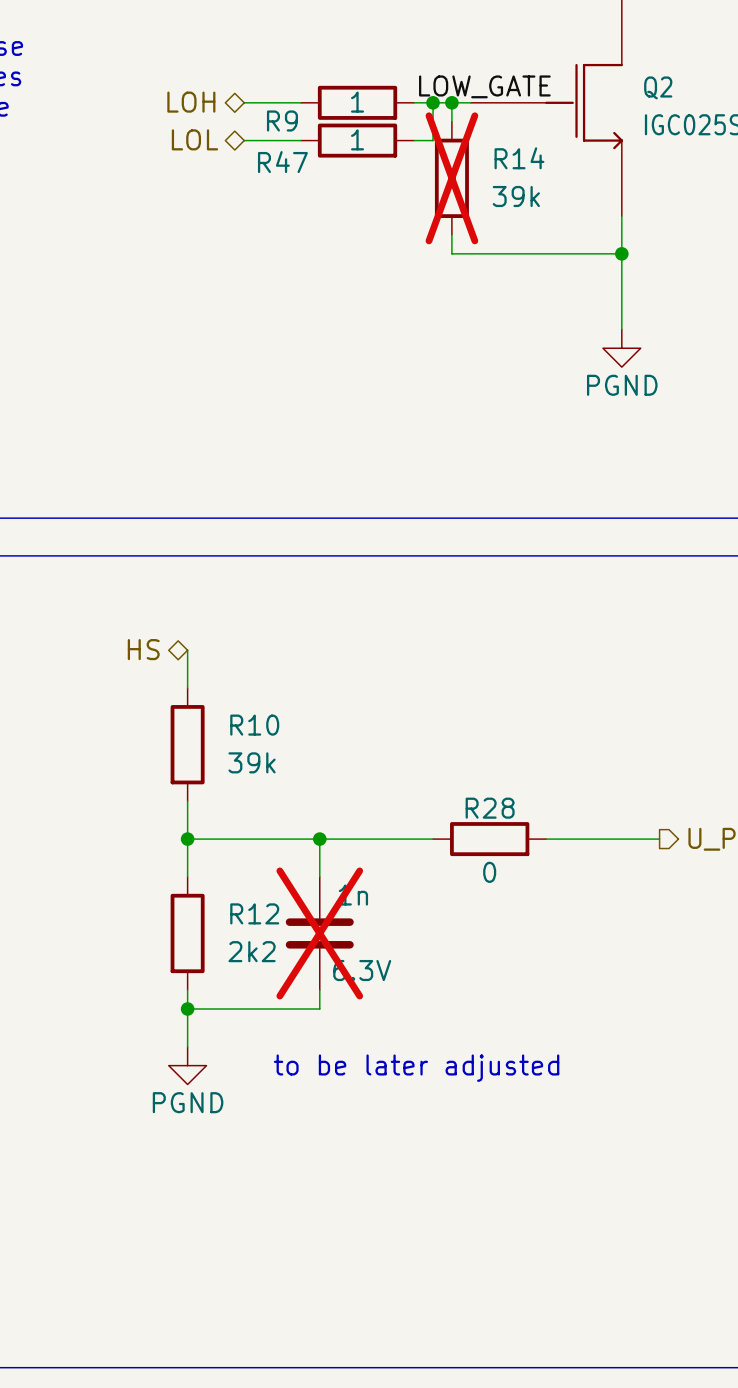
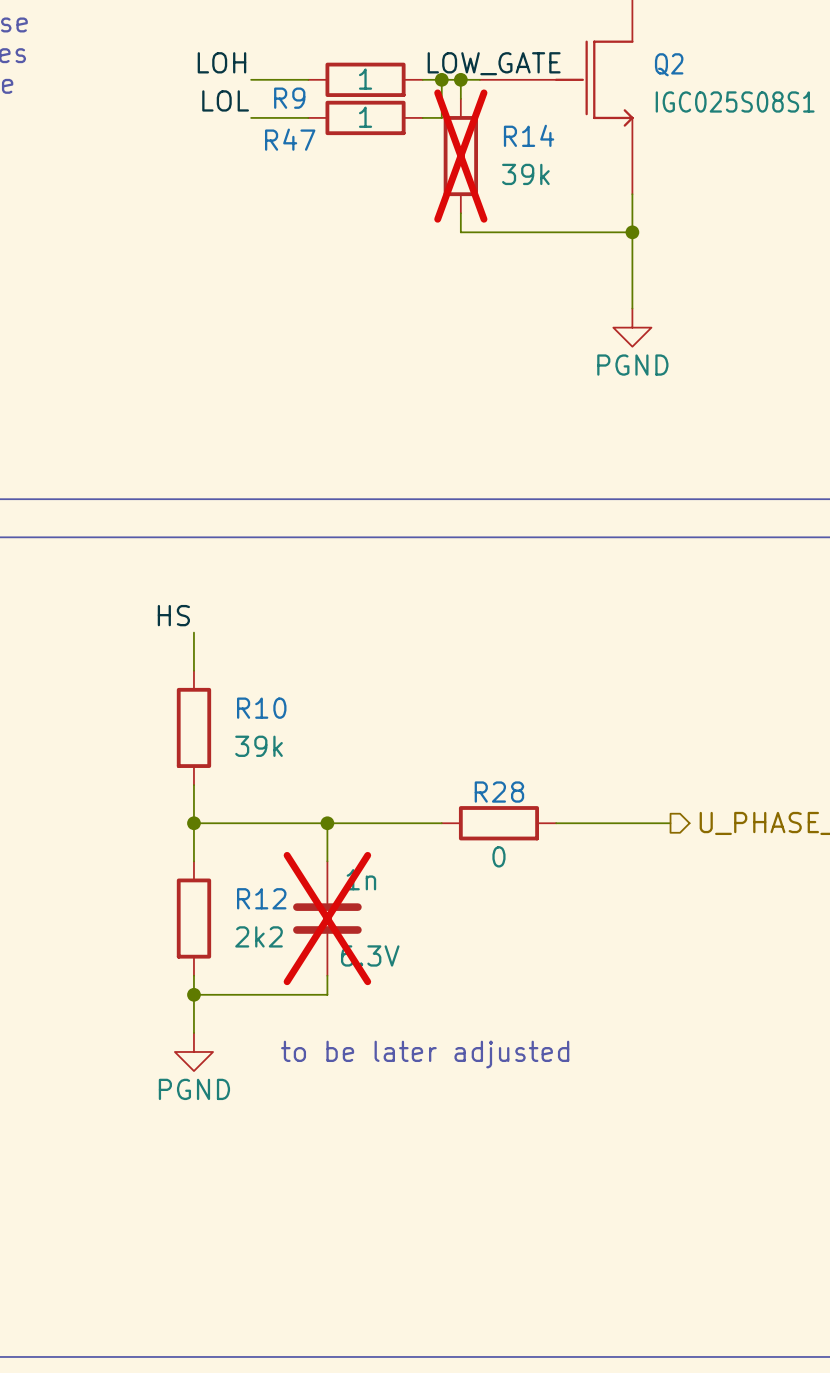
label: none -> LOH (221, 62)
hierarchical label: LOH (191, 102) -> none
label: none -> LOL (225, 100)
hierarchical label: LOL (194, 139) -> none
label: none -> HS (173, 615)
hierarchical label: HS (143, 649) -> none

